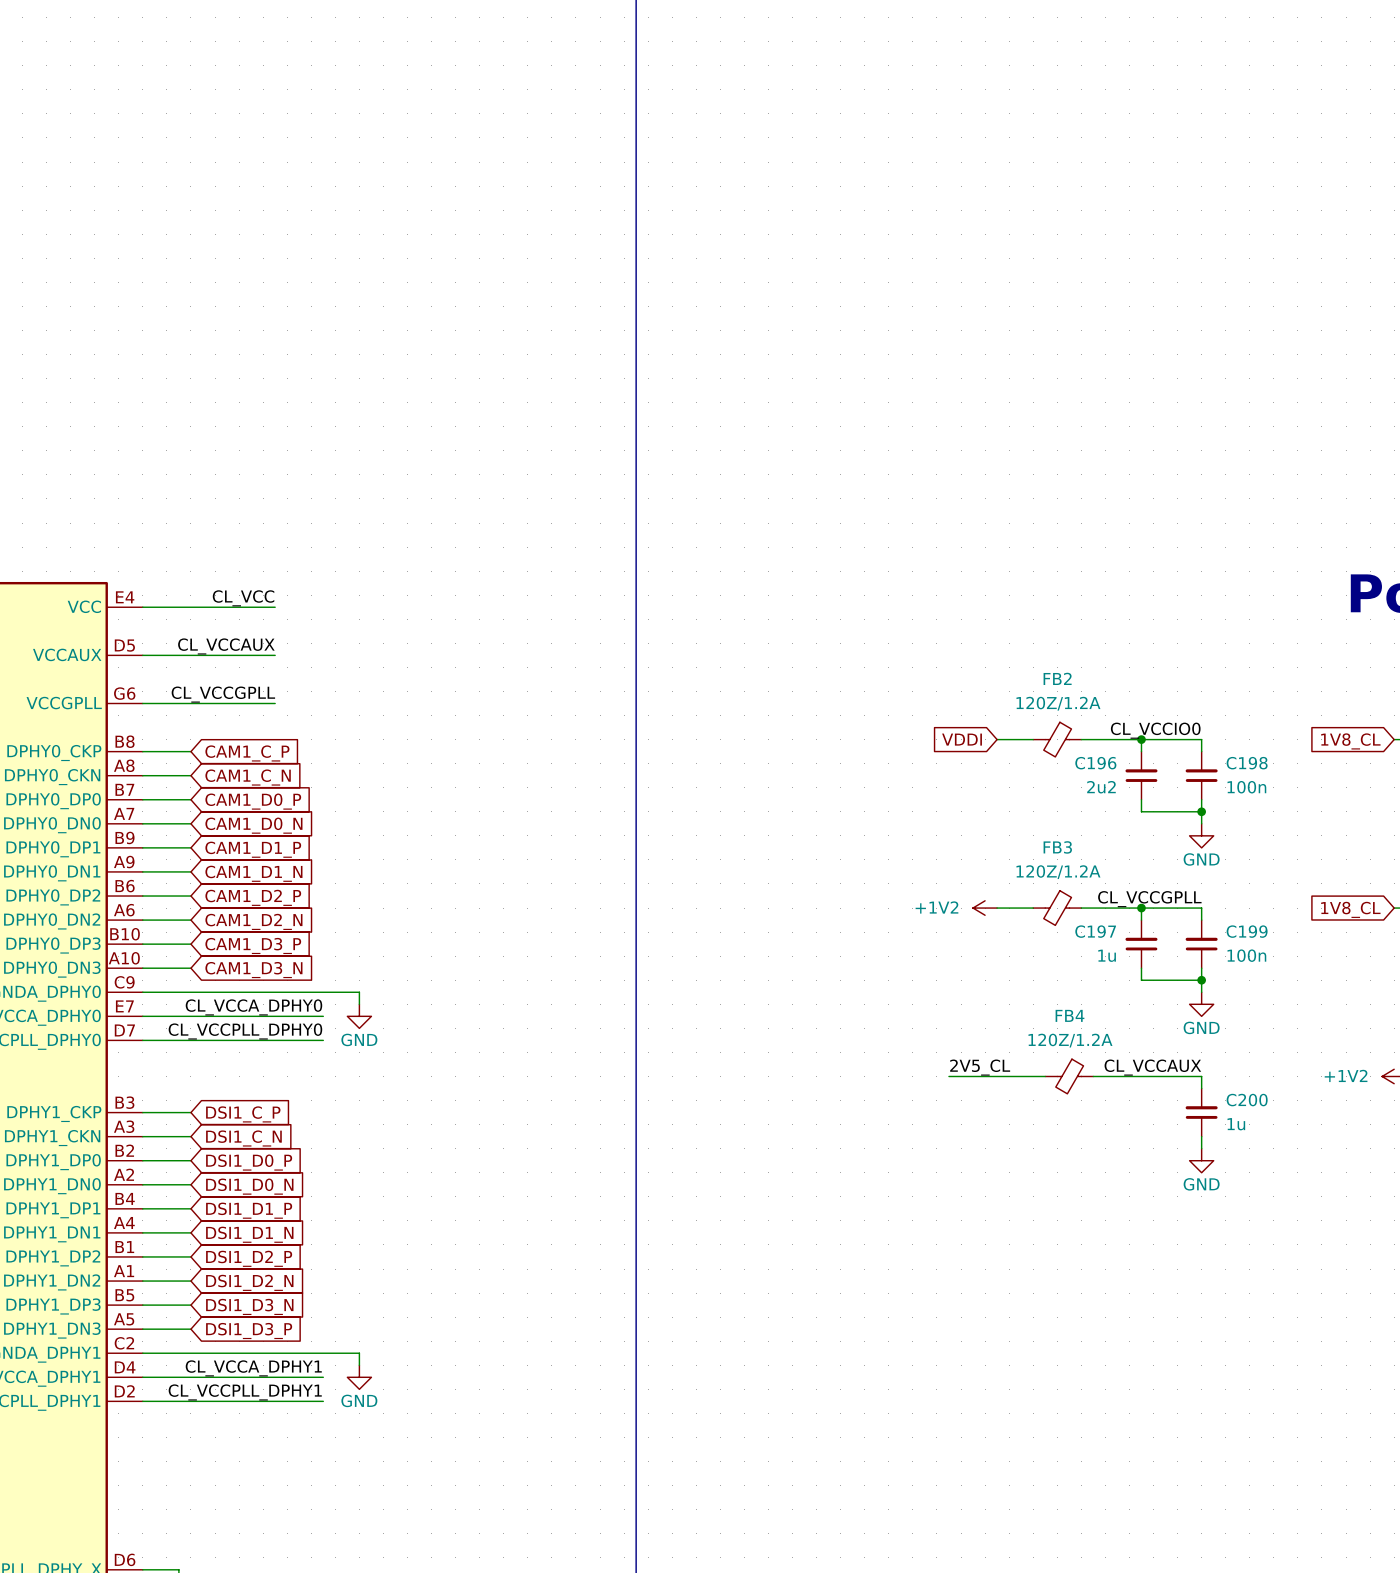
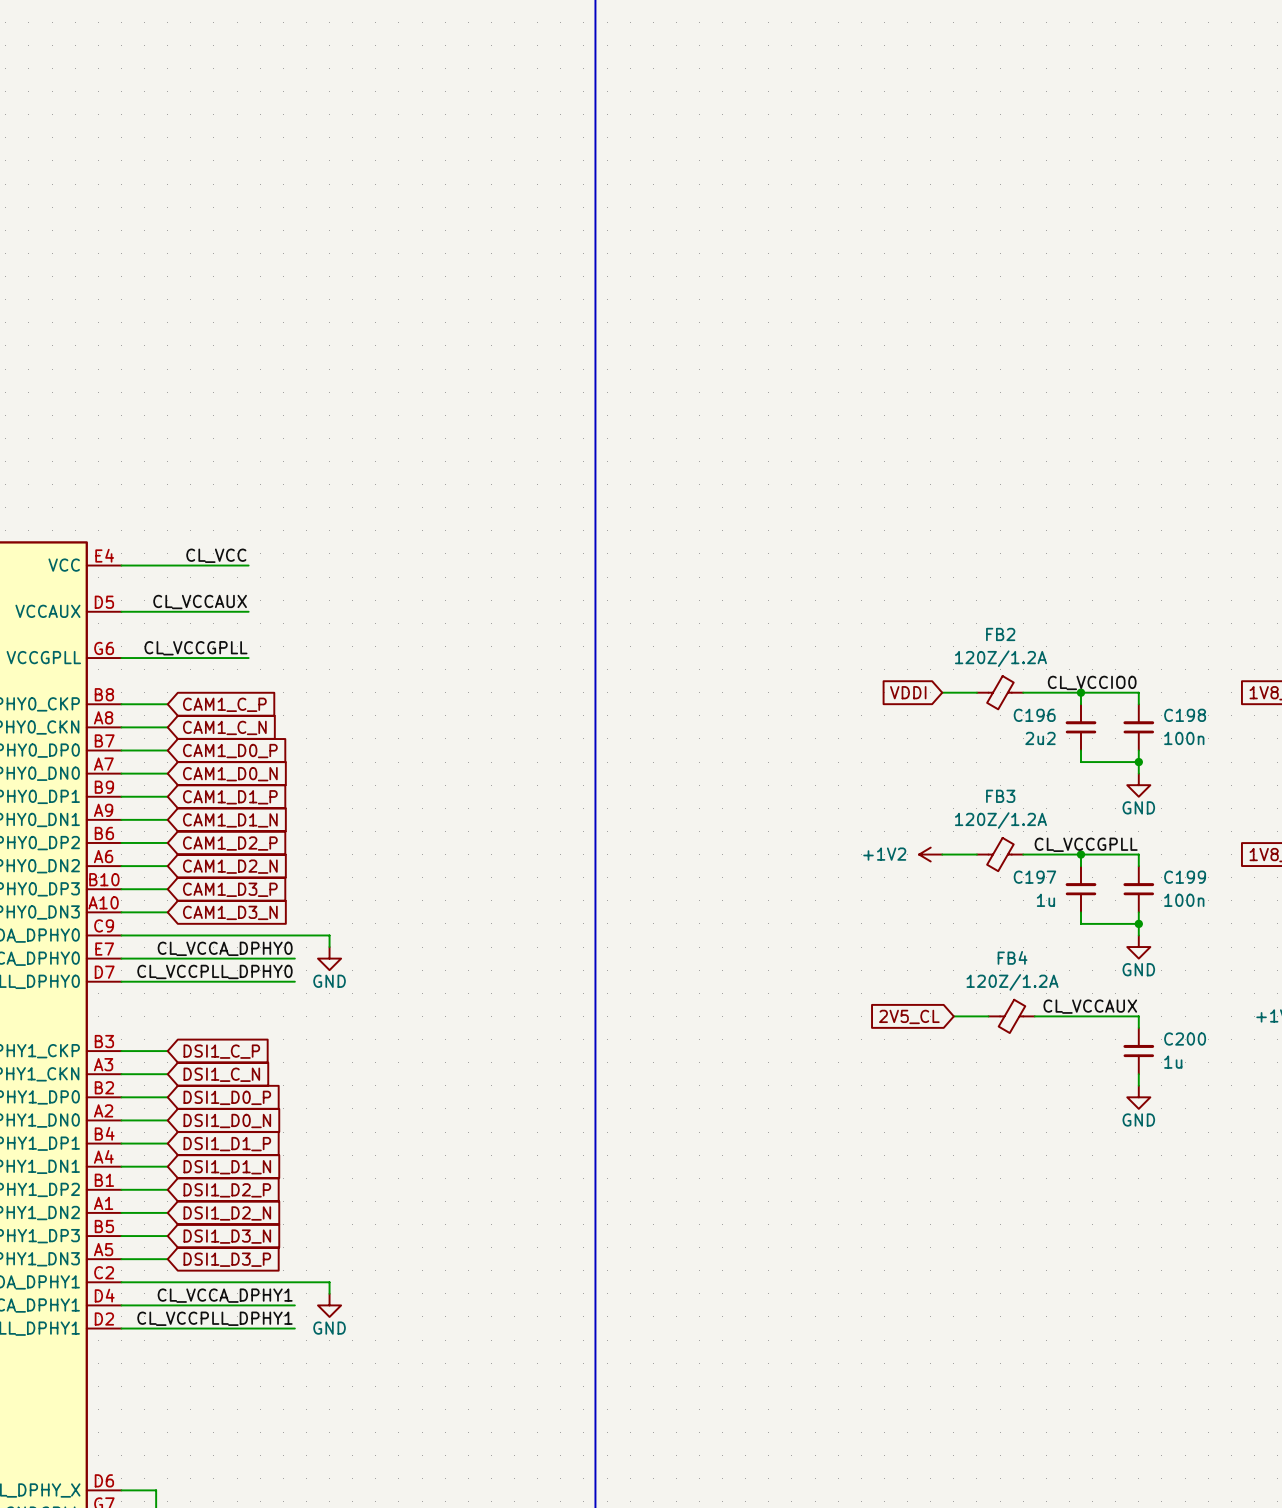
label: 2V5_CL (980, 1067) -> none
wire: (948, 1076) (1009, 1076) -> none
global label: none -> 2V5_CL (909, 1016)

